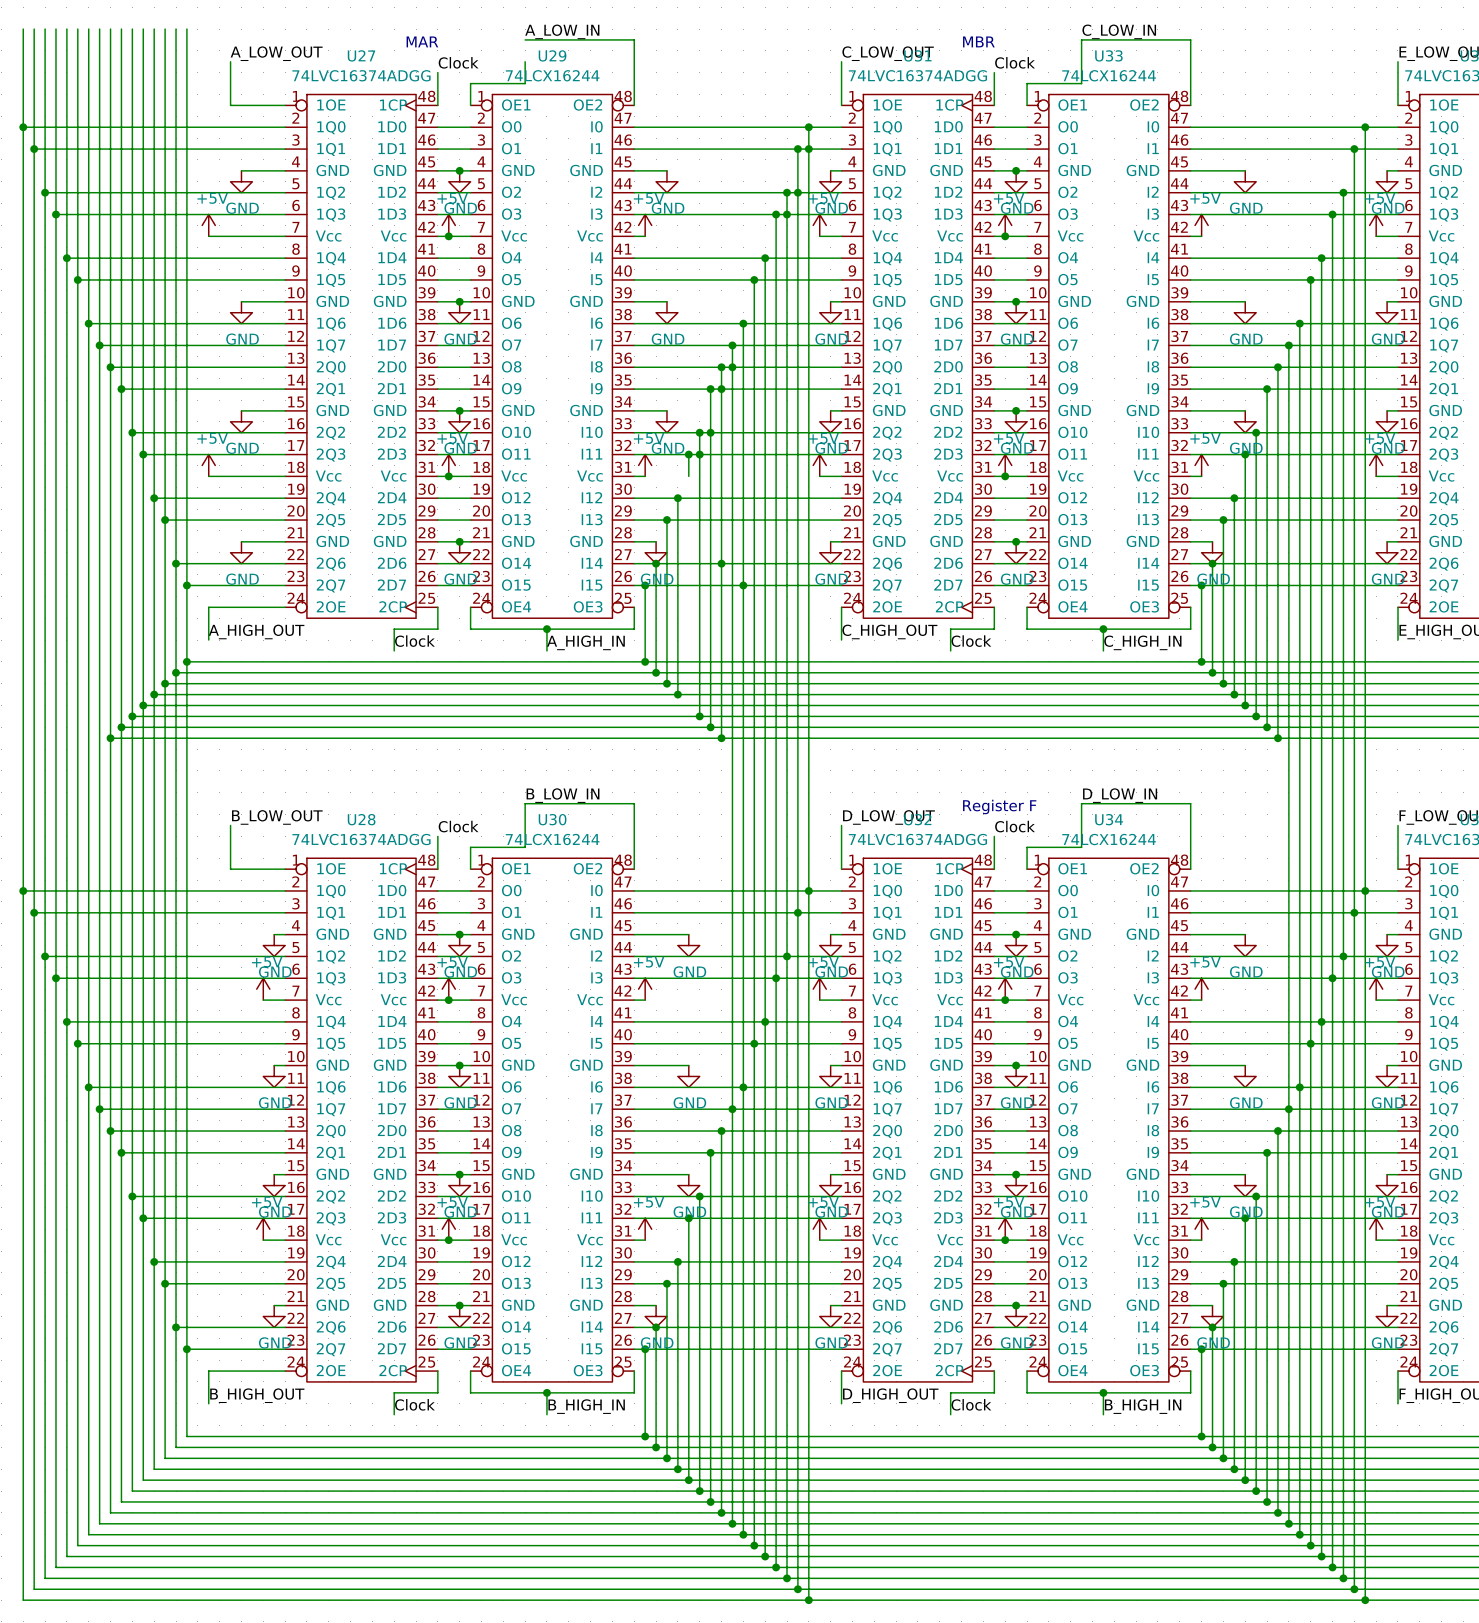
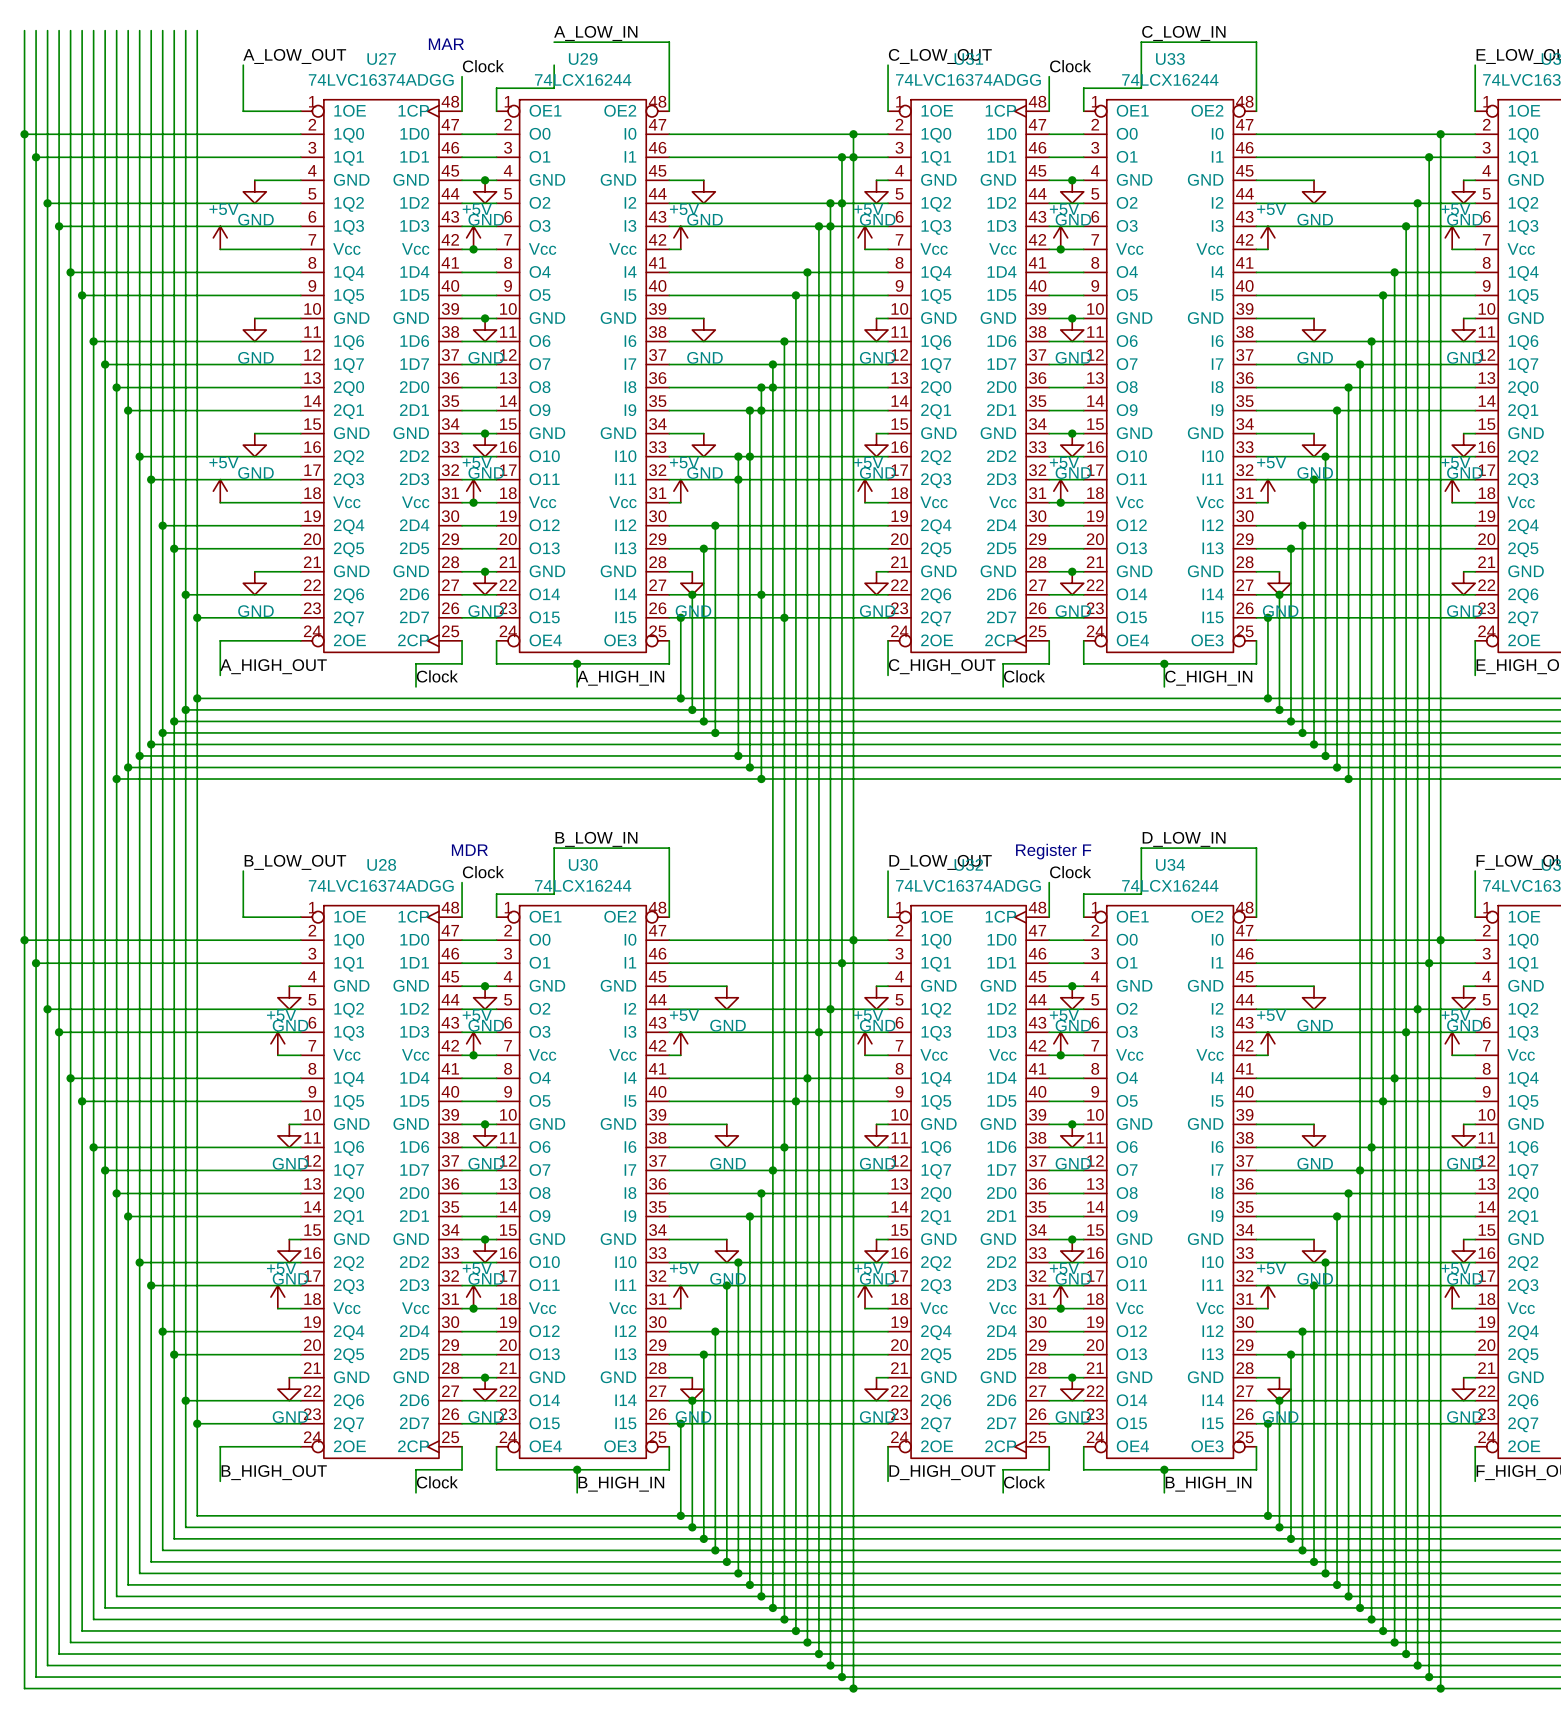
text: MBR (978, 41) -> none
wire: (688, 454) (688, 476) -> none
junction: (688, 454) -> none
text: none -> MDR (469, 850)

